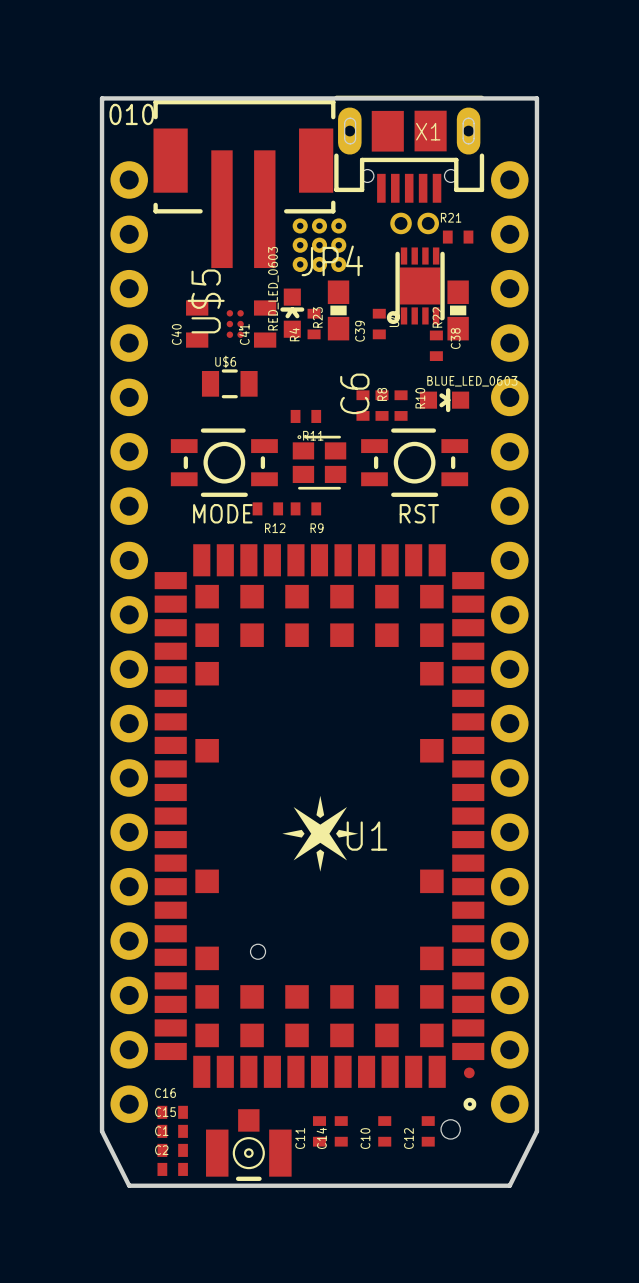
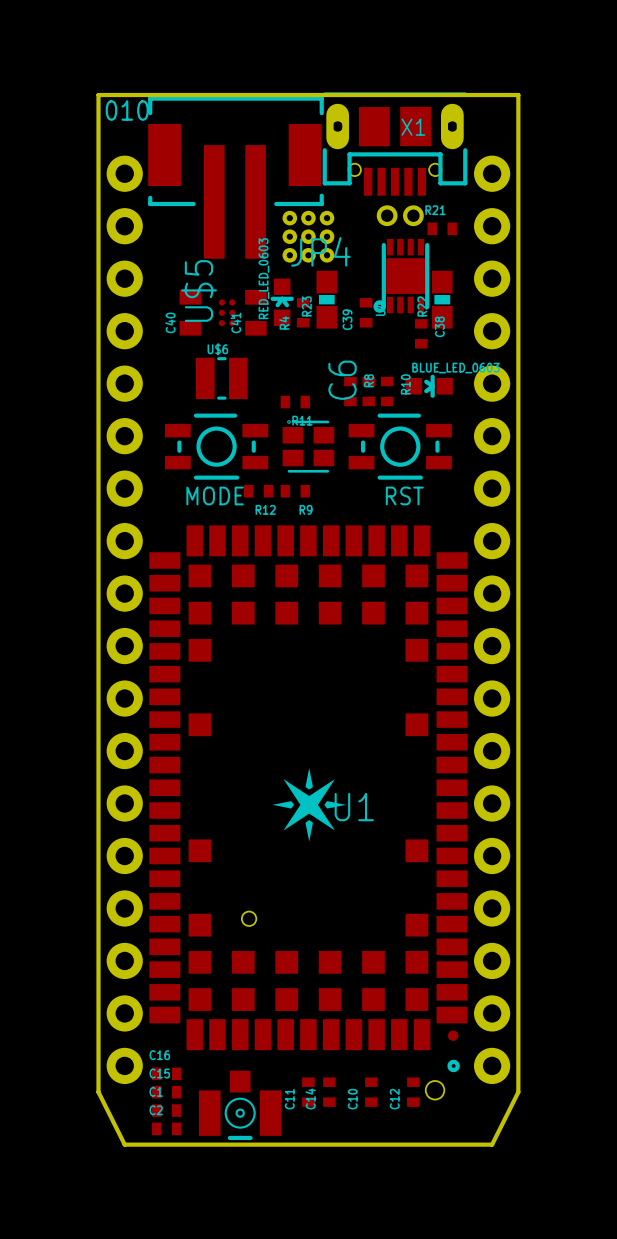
U$6 footprint: [201, 369, 258, 399] -> [196, 357, 248, 400]

